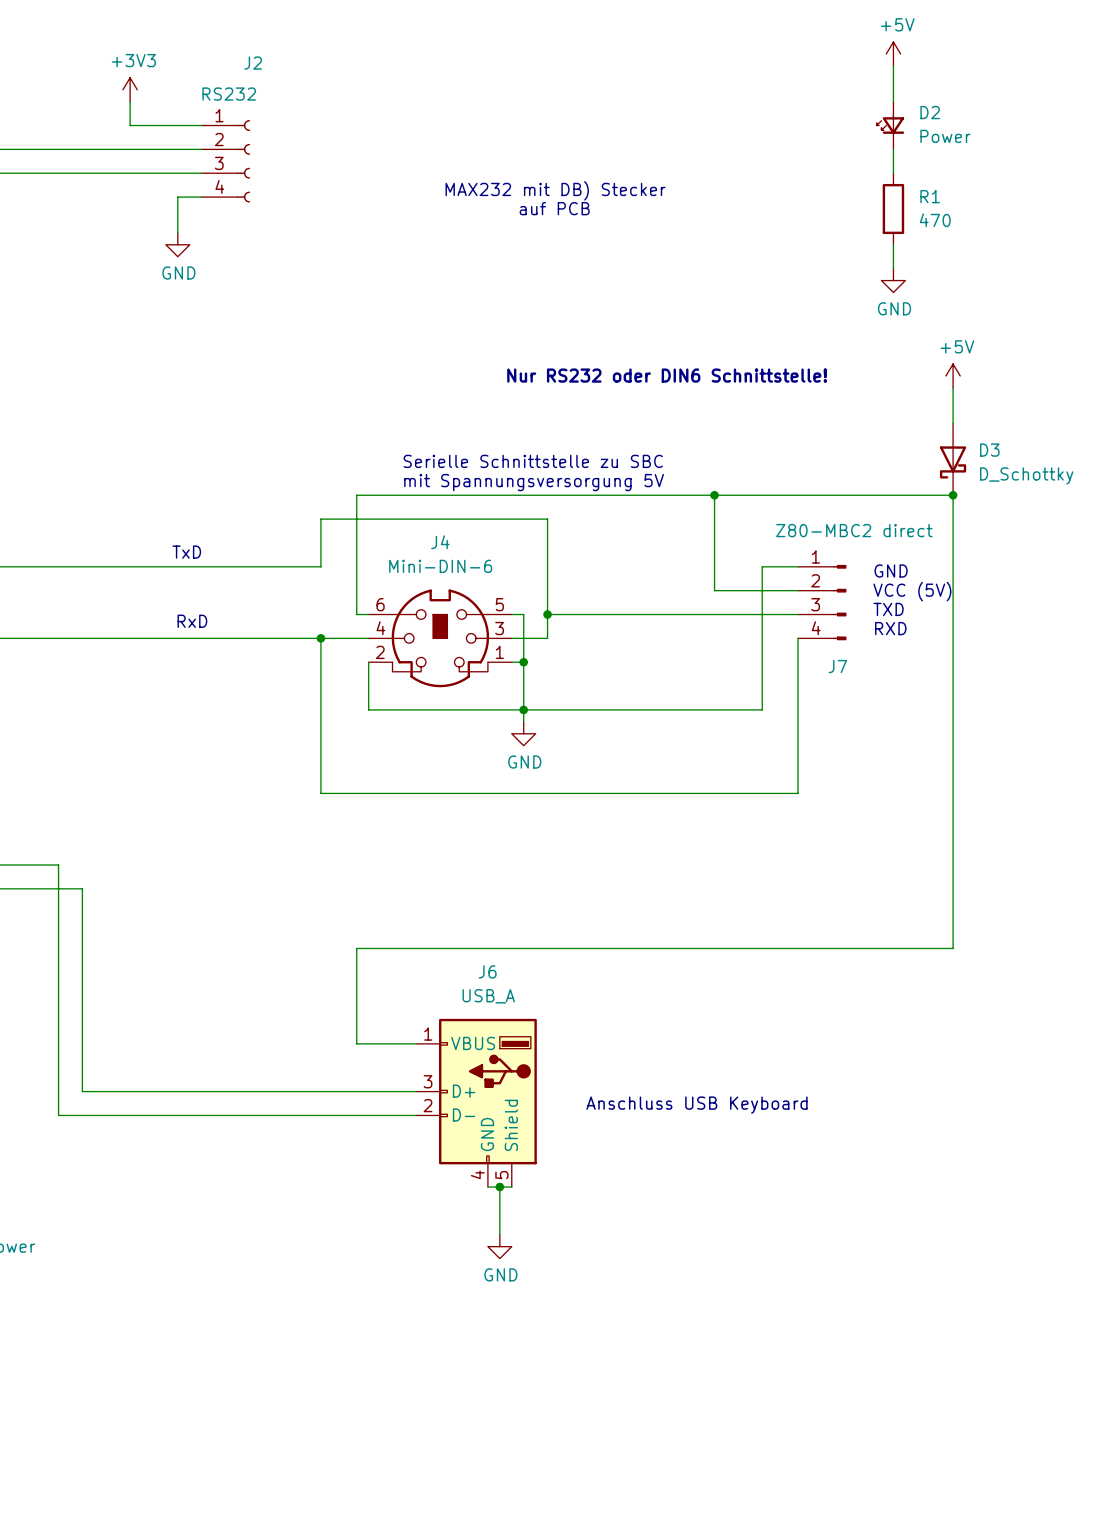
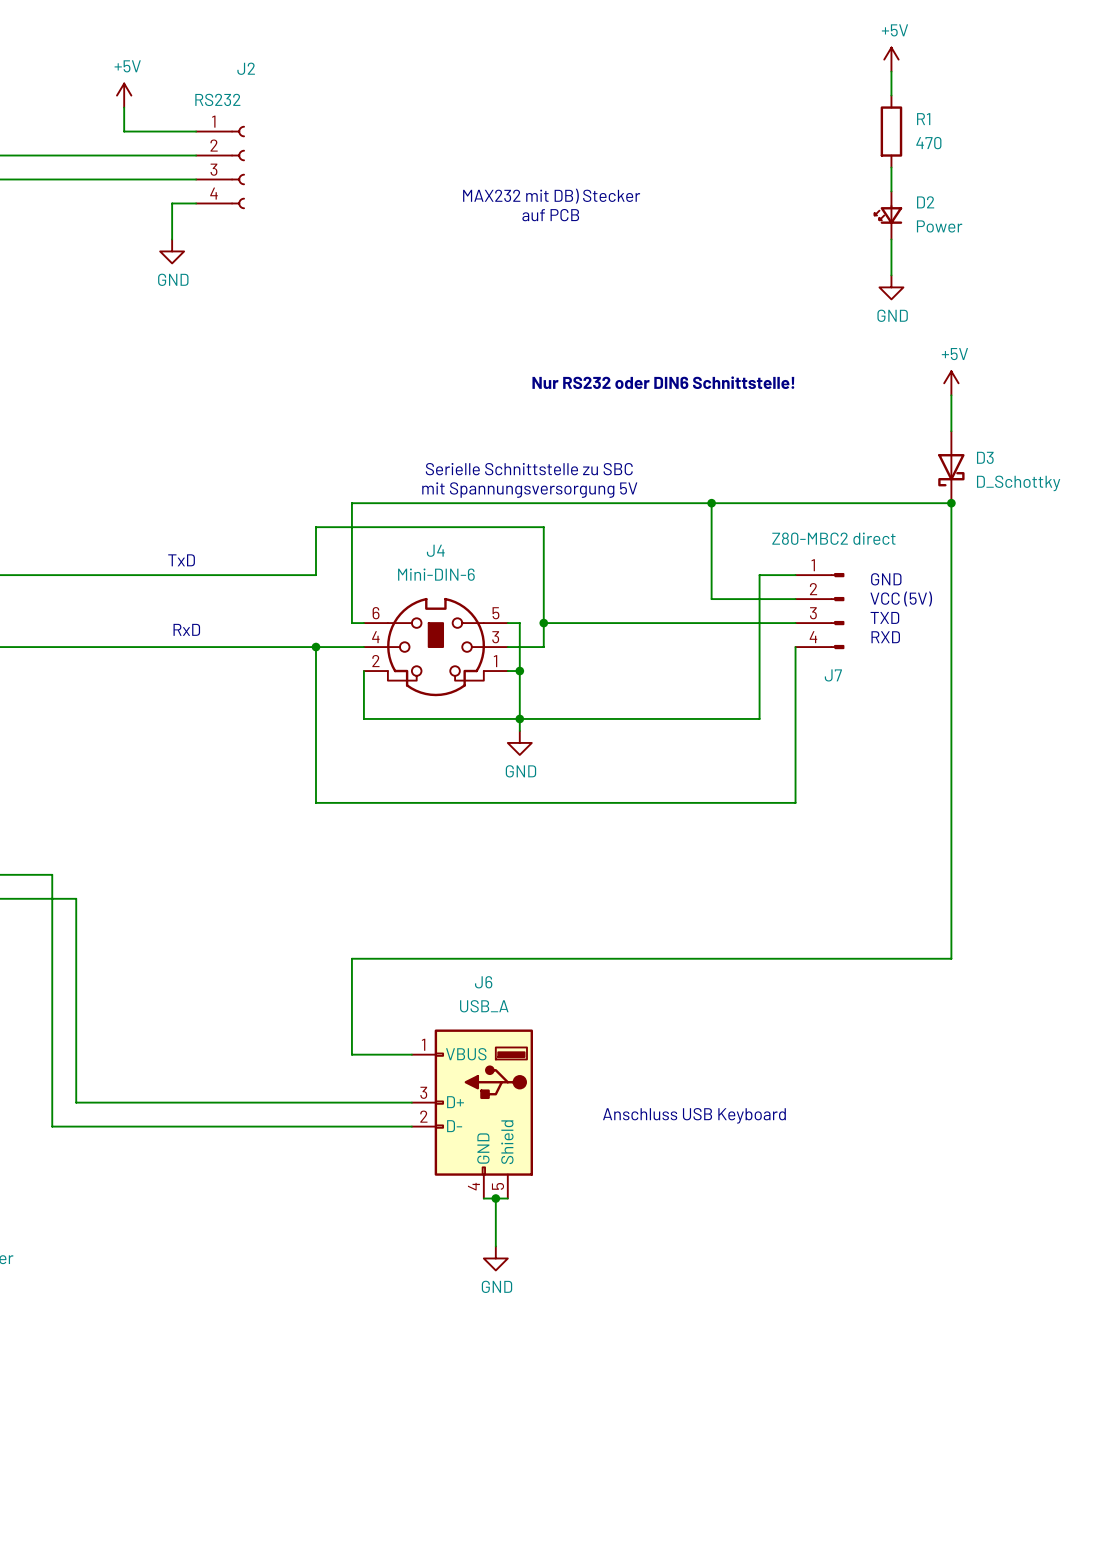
power symbol: +3V3 (130, 89) -> +5V (124, 95)
D2 position: (890, 125) -> (888, 215)
R1 position: (893, 209) -> (891, 131)

